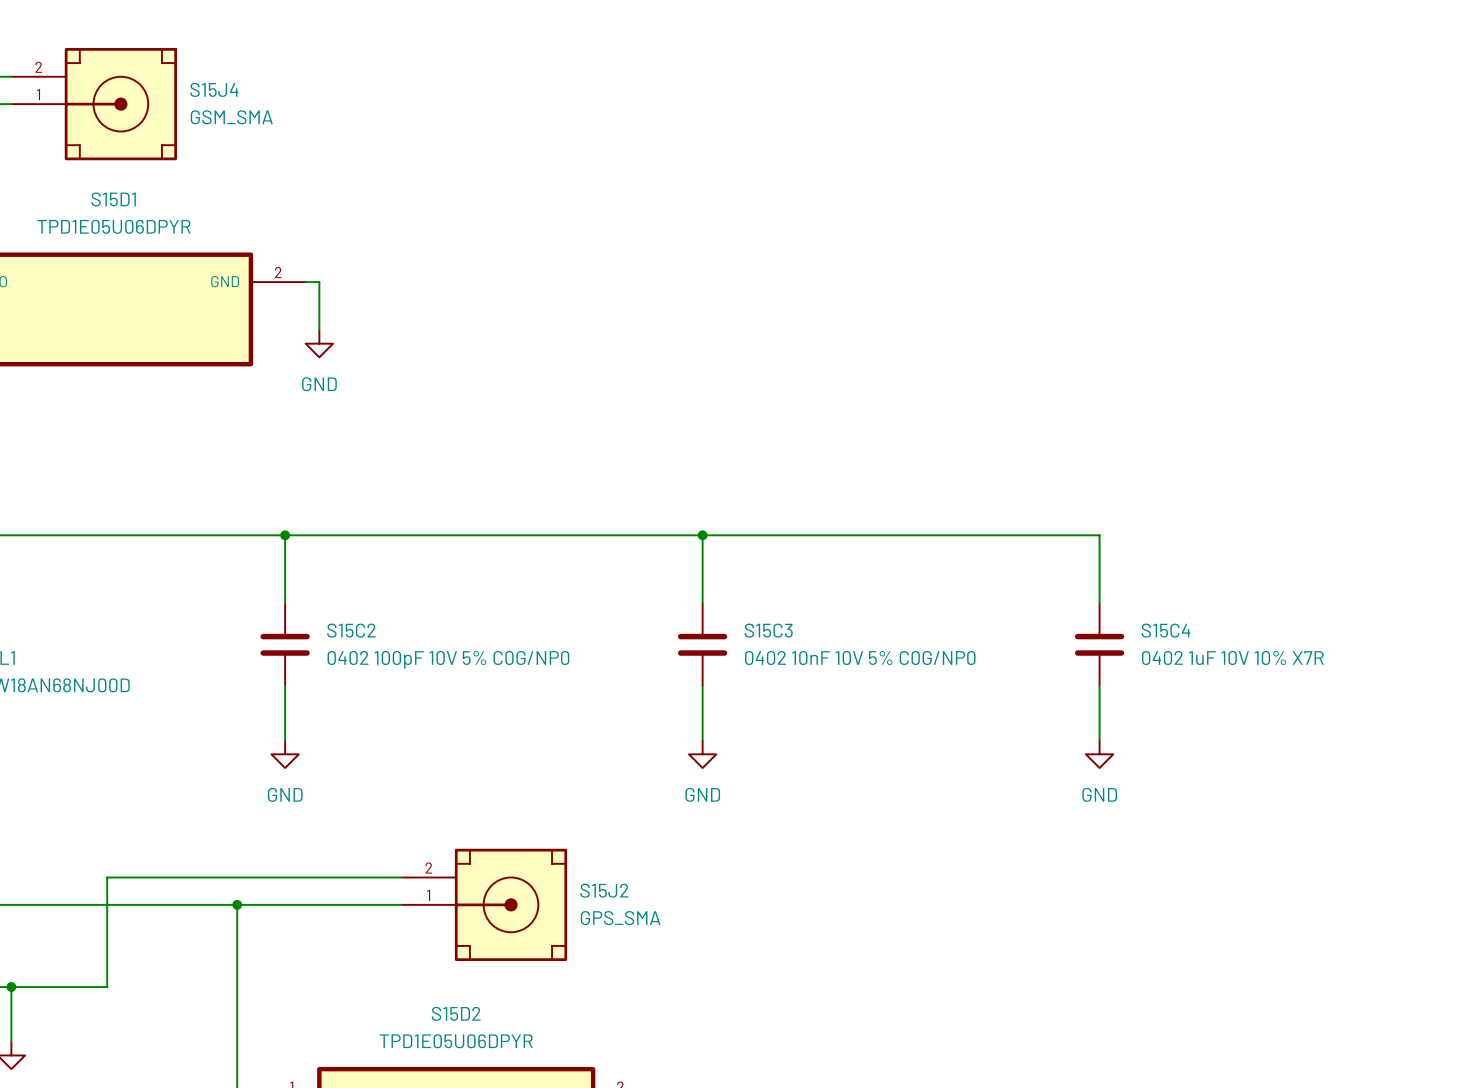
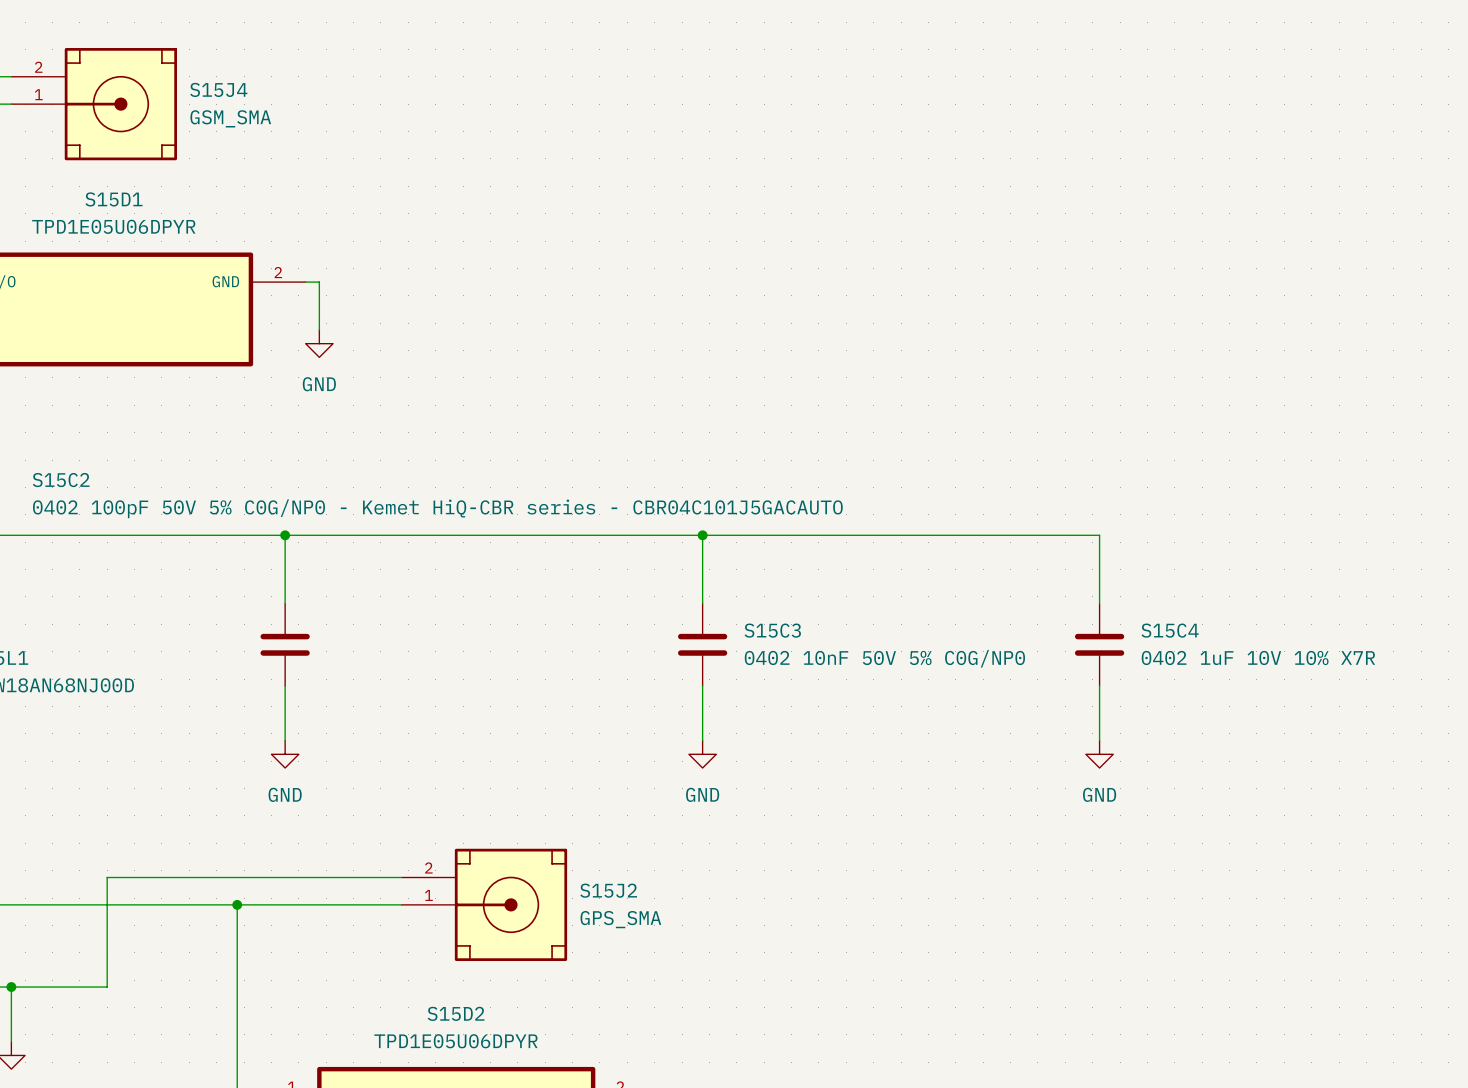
S15C2 name position: S15C2 (351, 630) -> S15C2 (61, 480)
S15C3 value: 0402 10nF 10V 5% C0G/NP0 (860, 657) -> 0402 10nF 50V 5% C0G/NP0 (884, 658)
S15C2 value: 0402 100pF 10V 5% C0G/NP0 (448, 659) -> 0402 100pF 50V 5% C0G/NP0 - Kemet HiQ-CBR series - CBR04C101J5GACAUTO (437, 508)

